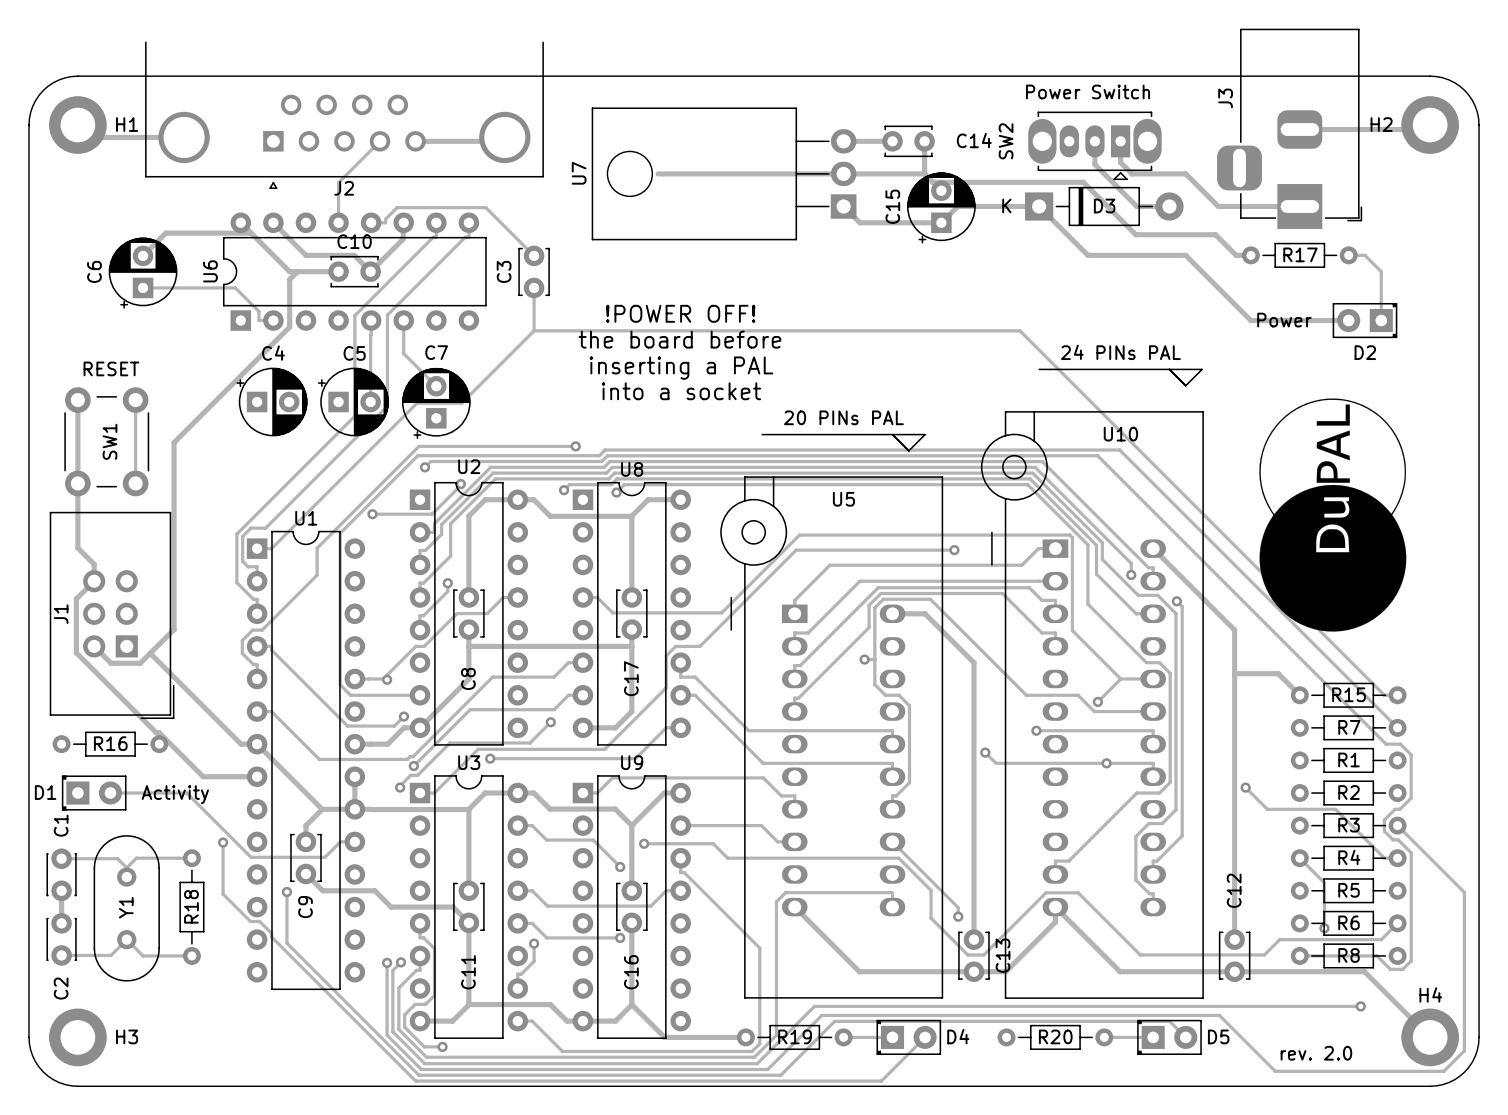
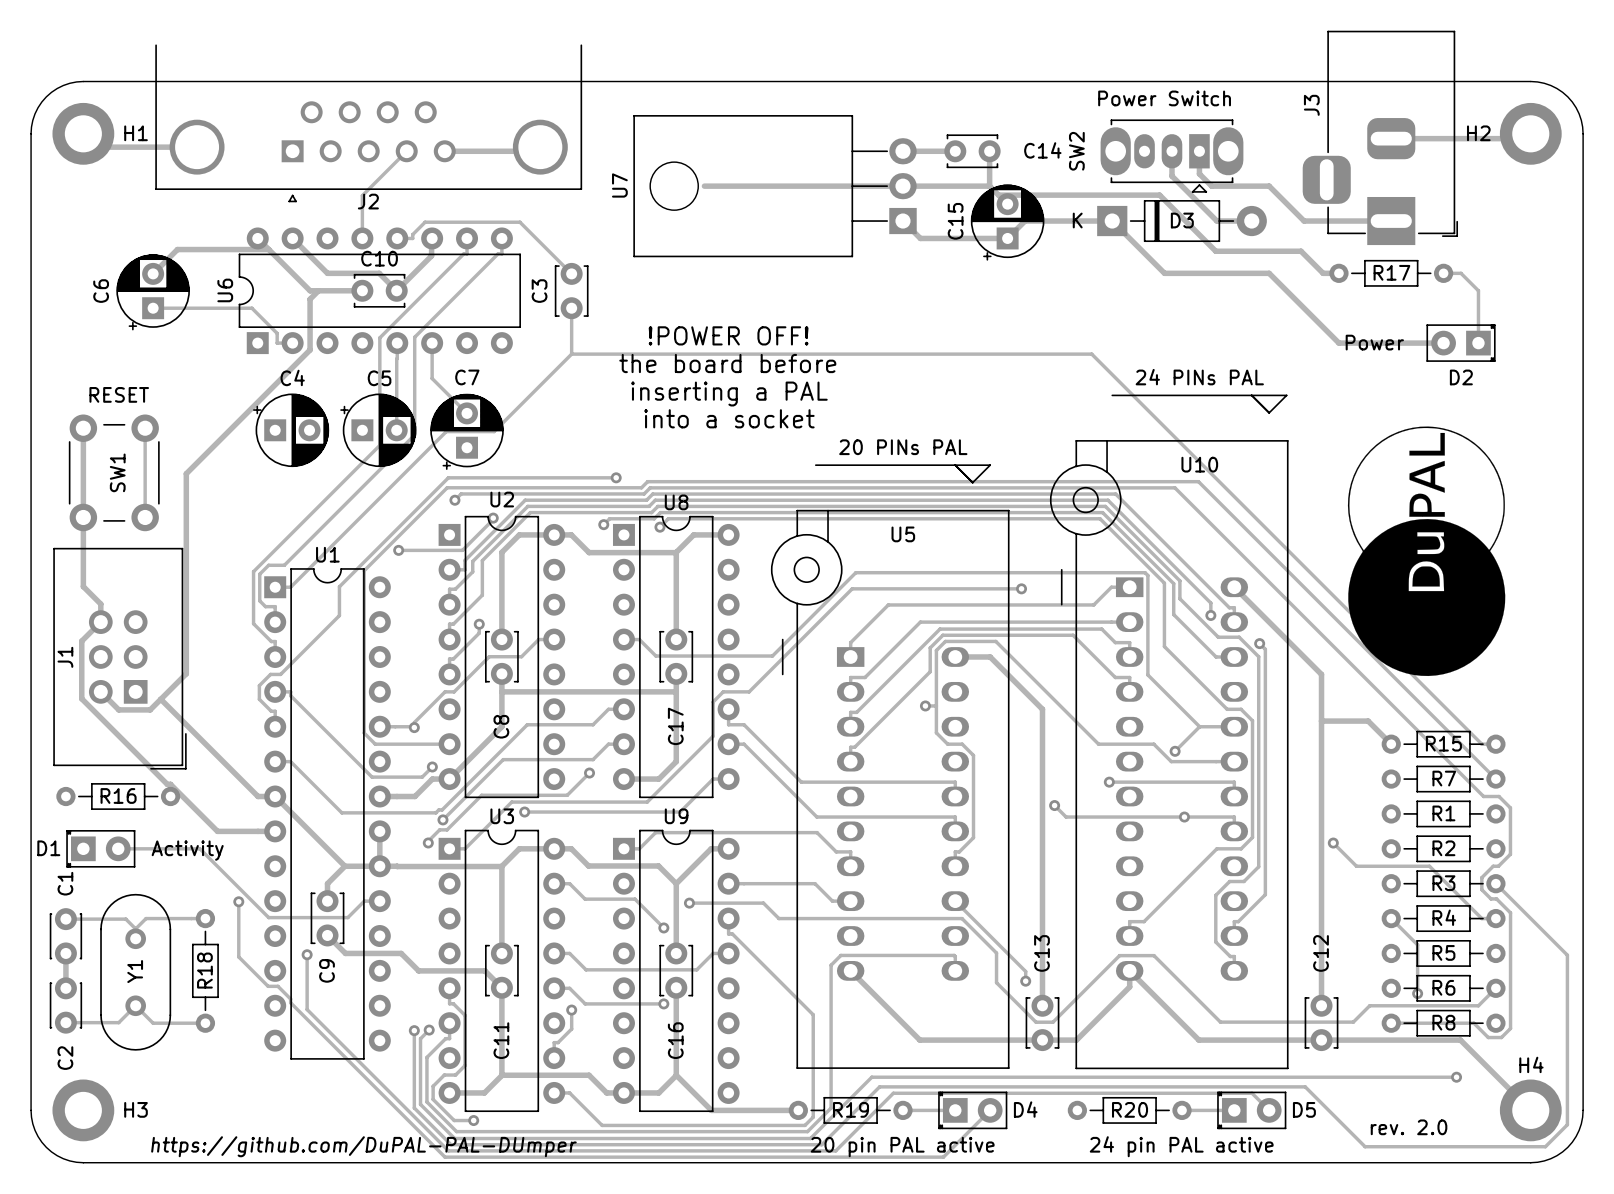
C13 name position: C13 (1003, 955) -> C13 (1041, 953)
text: none -> https://github.com/DuPAL-PAL-DUmper (363, 1146)
text: none -> 20 pin PAL active (902, 1147)
text: none -> 24 pin PAL active (1181, 1146)

